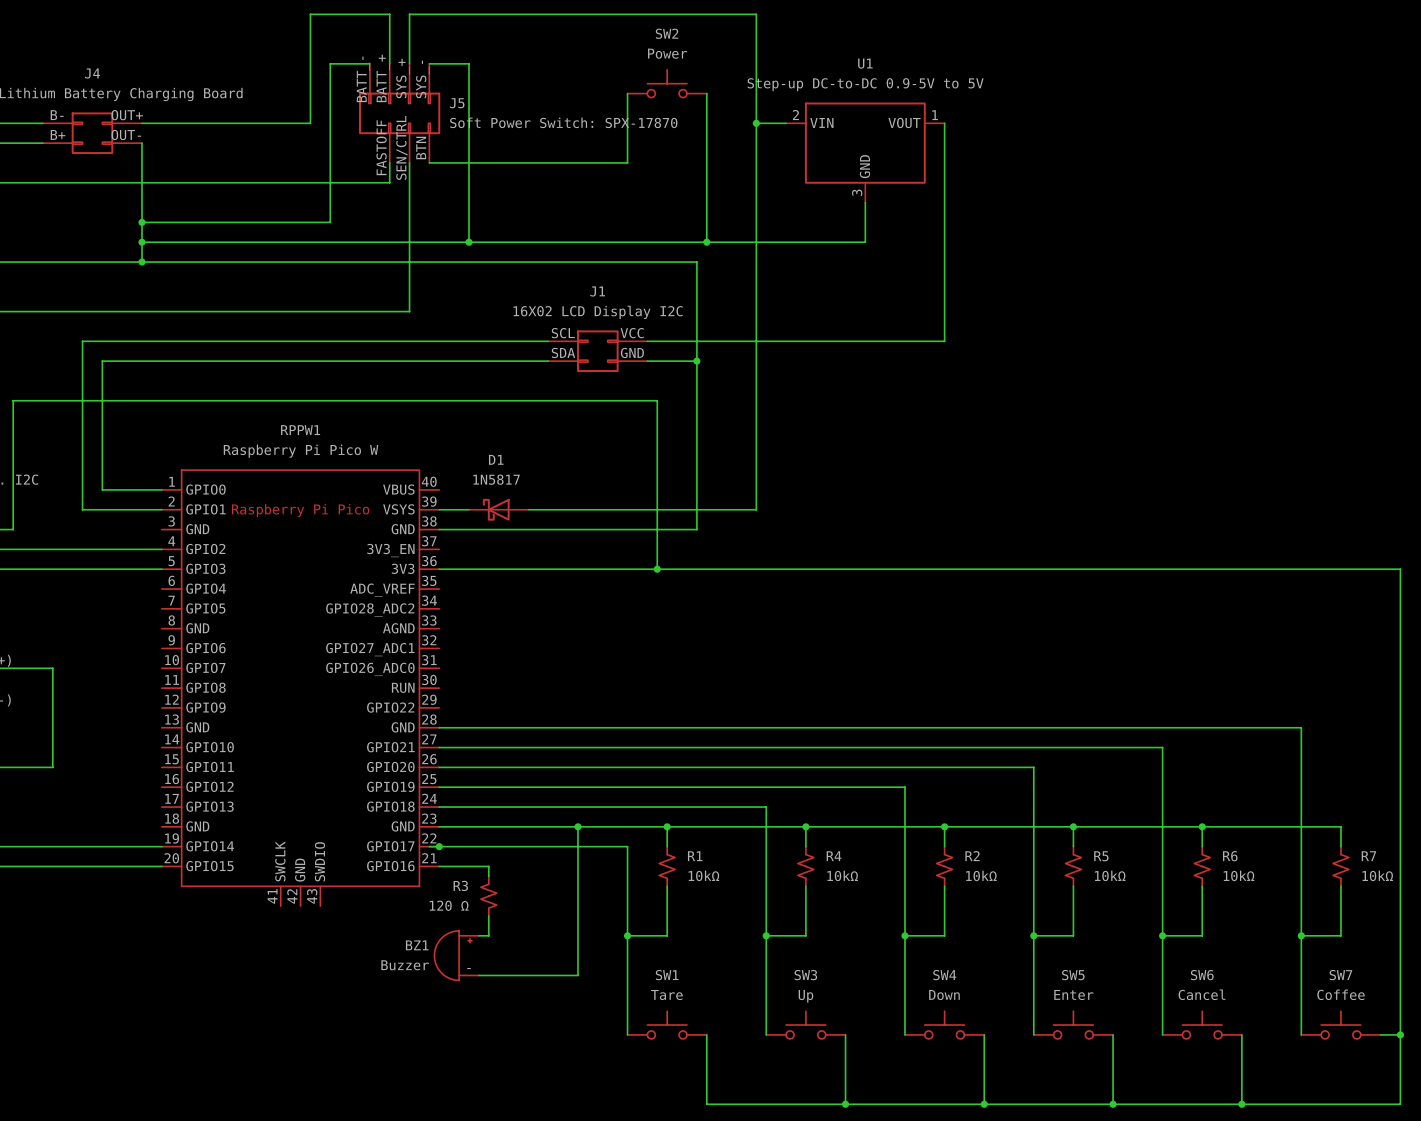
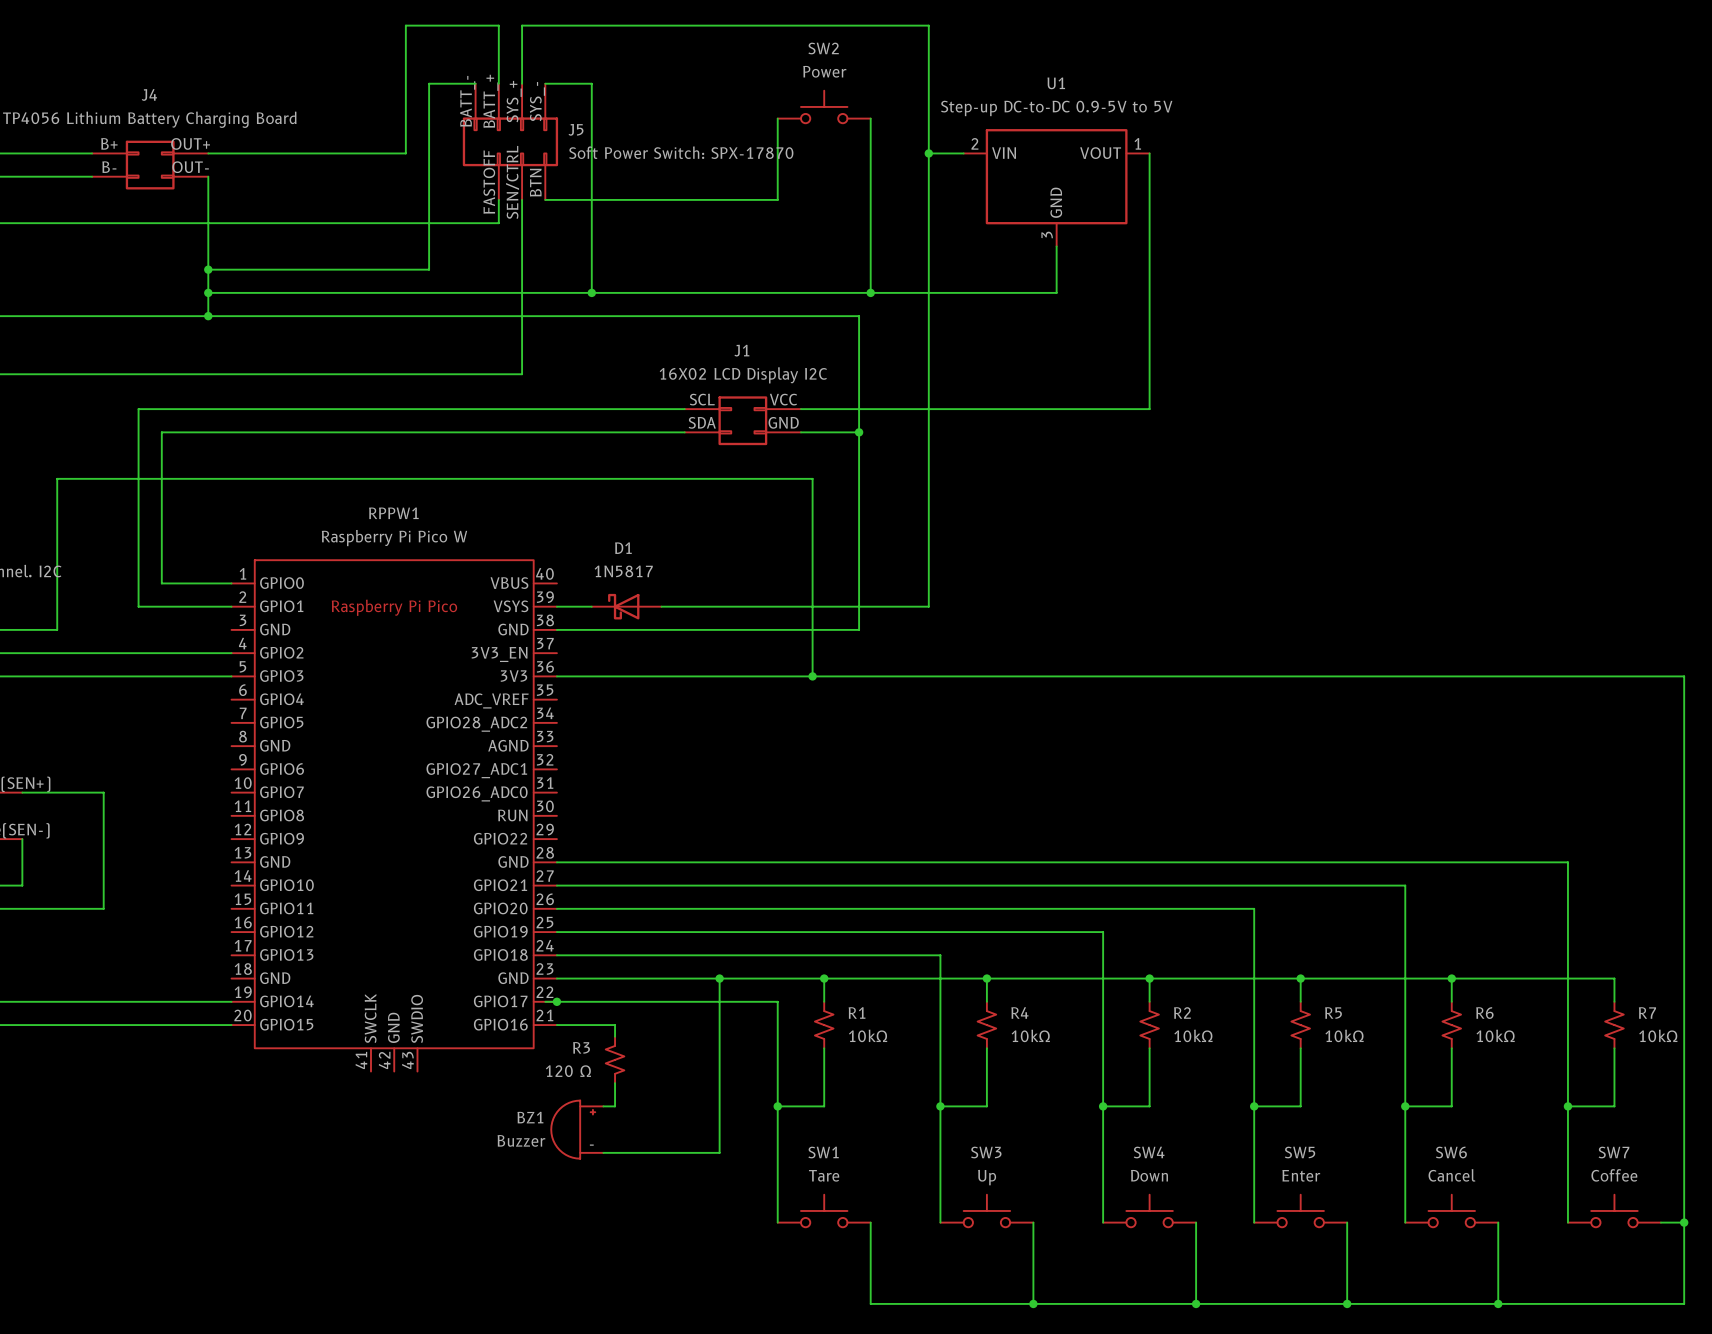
J4 pin number: B- (57, 115) -> B+ (109, 143)
J4 pin number: B+ (58, 134) -> B- (109, 167)

